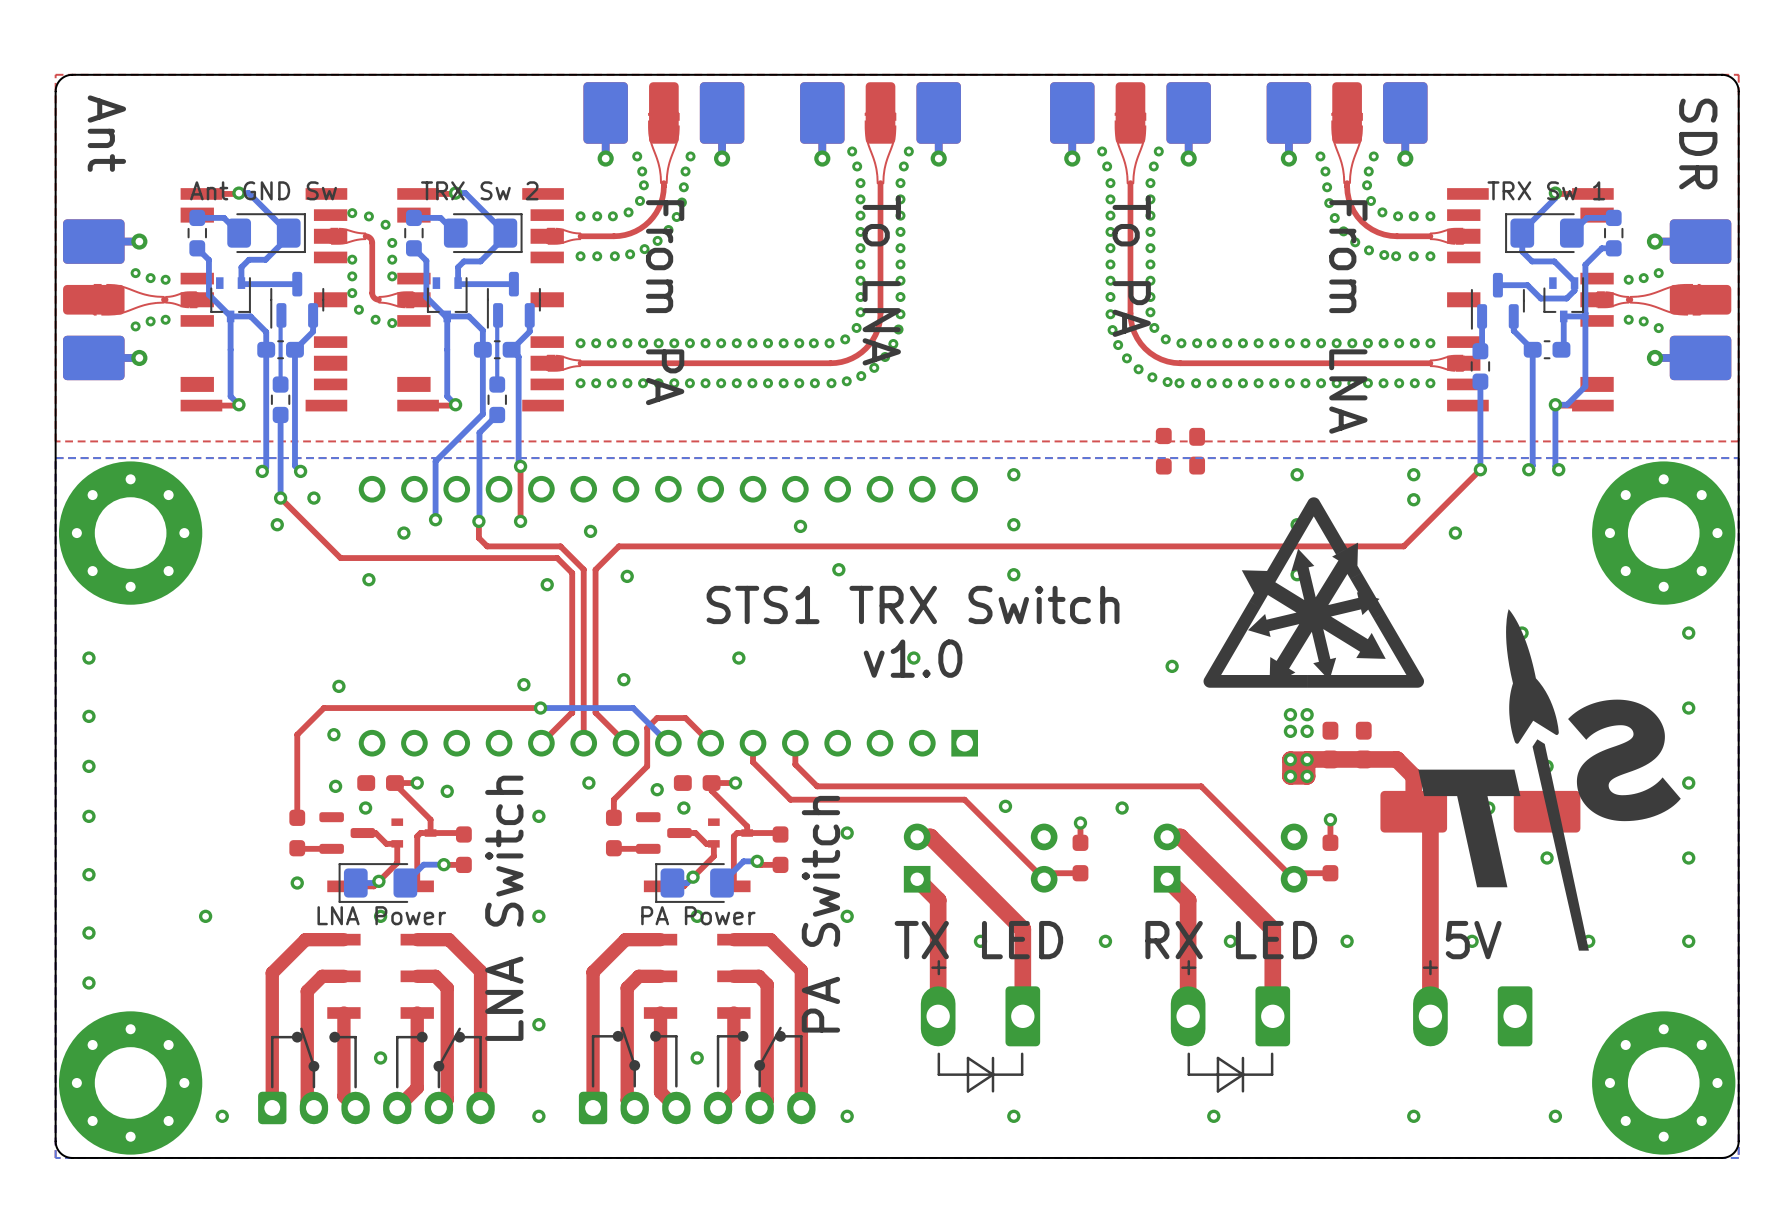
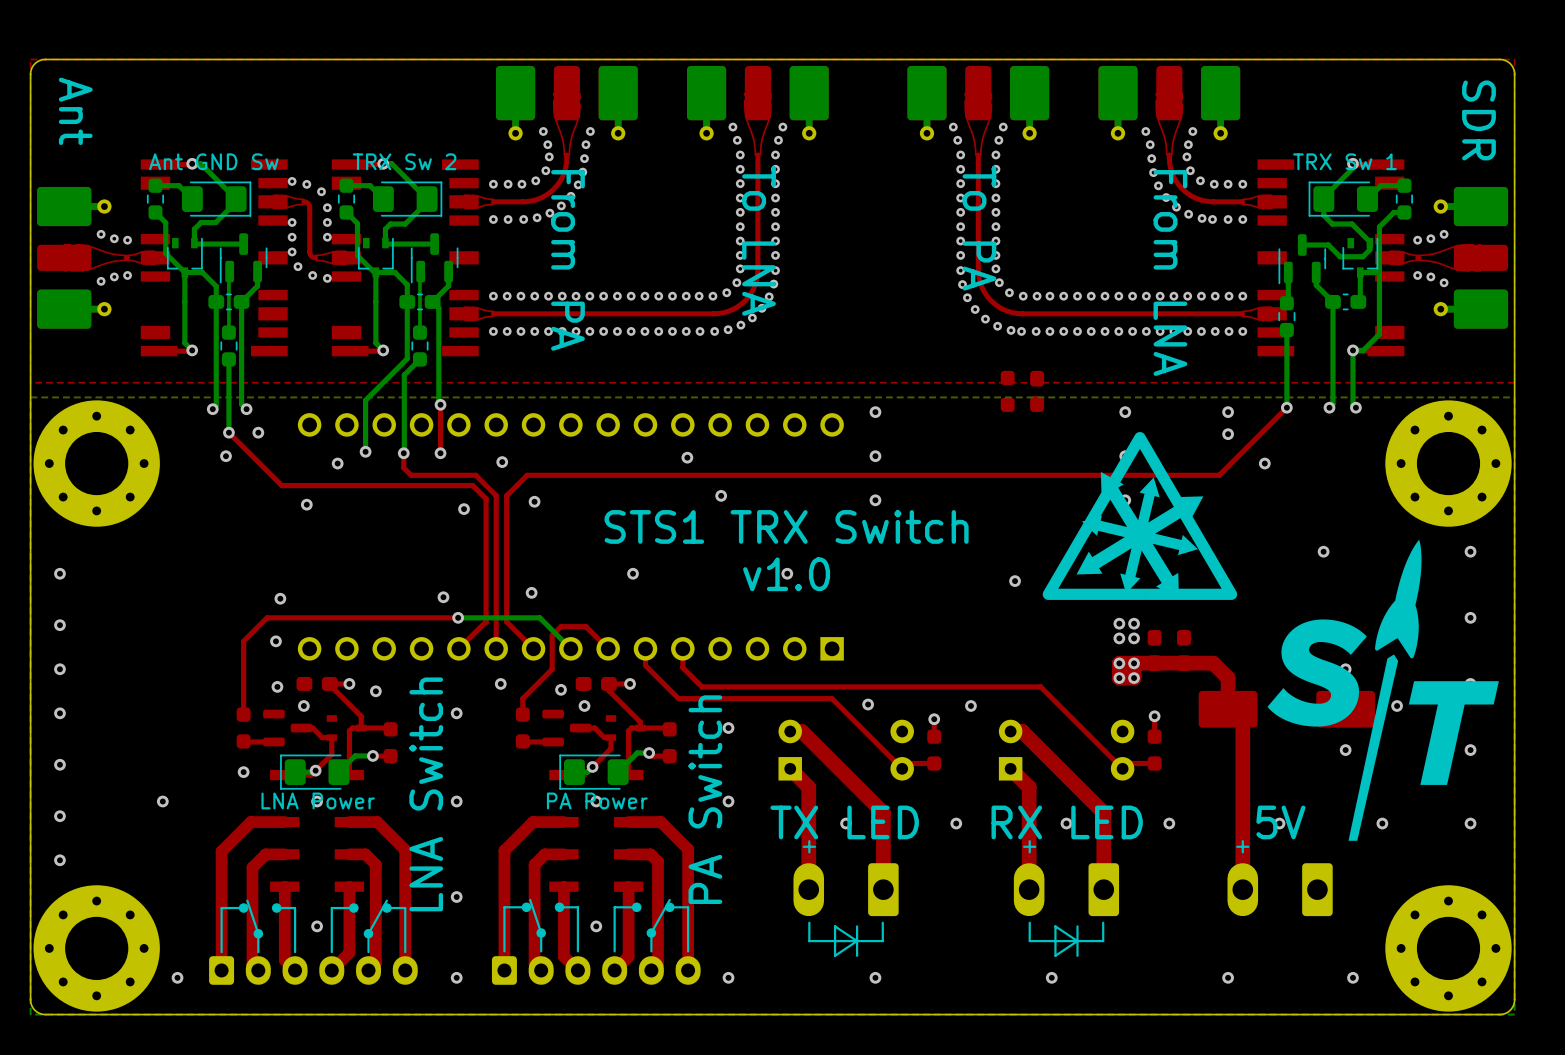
drawing shape: [1203, 497, 1425, 688] -> [1042, 432, 1238, 600]
drawing: [1418, 609, 1681, 951] -> none
drawing: none -> [1267, 539, 1499, 841]

